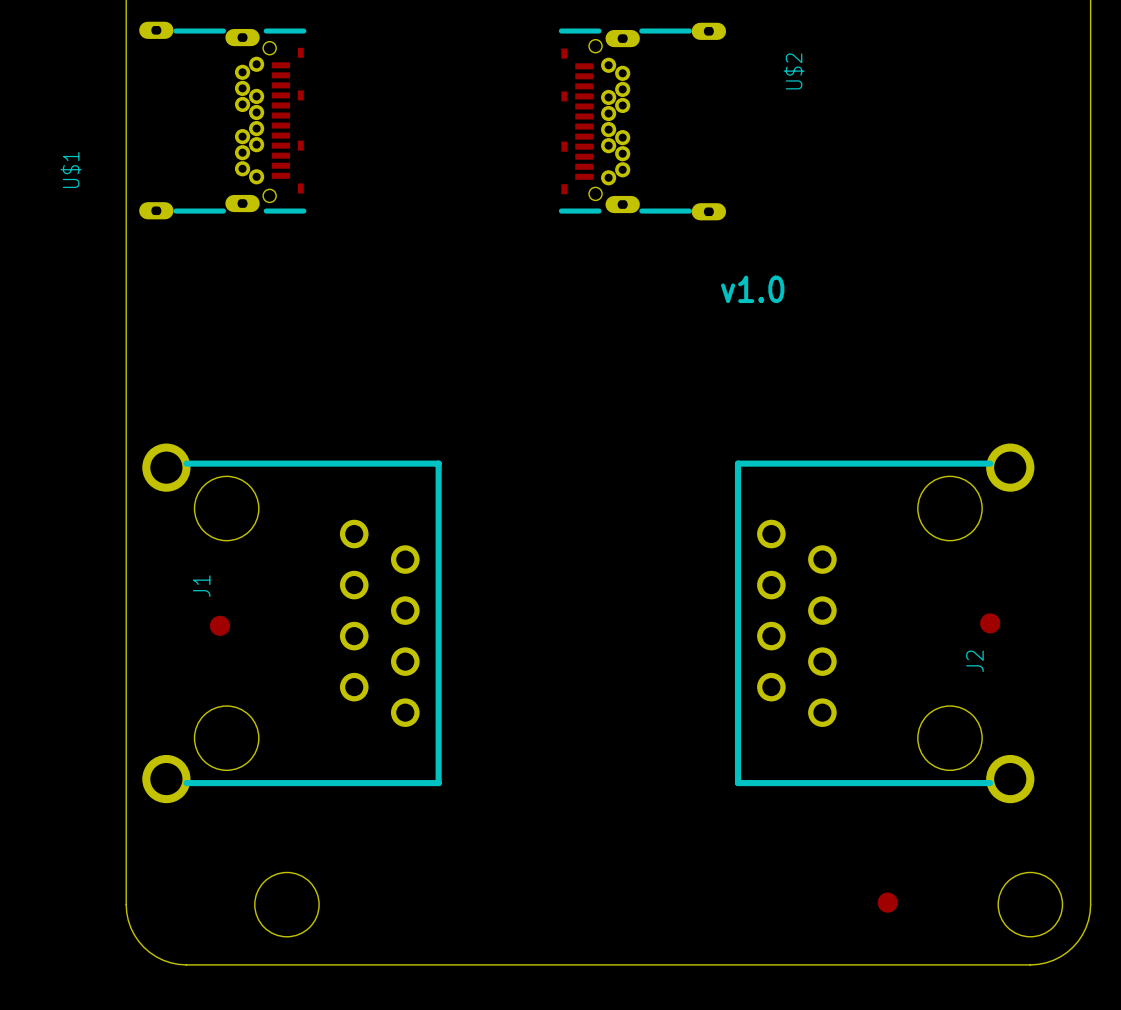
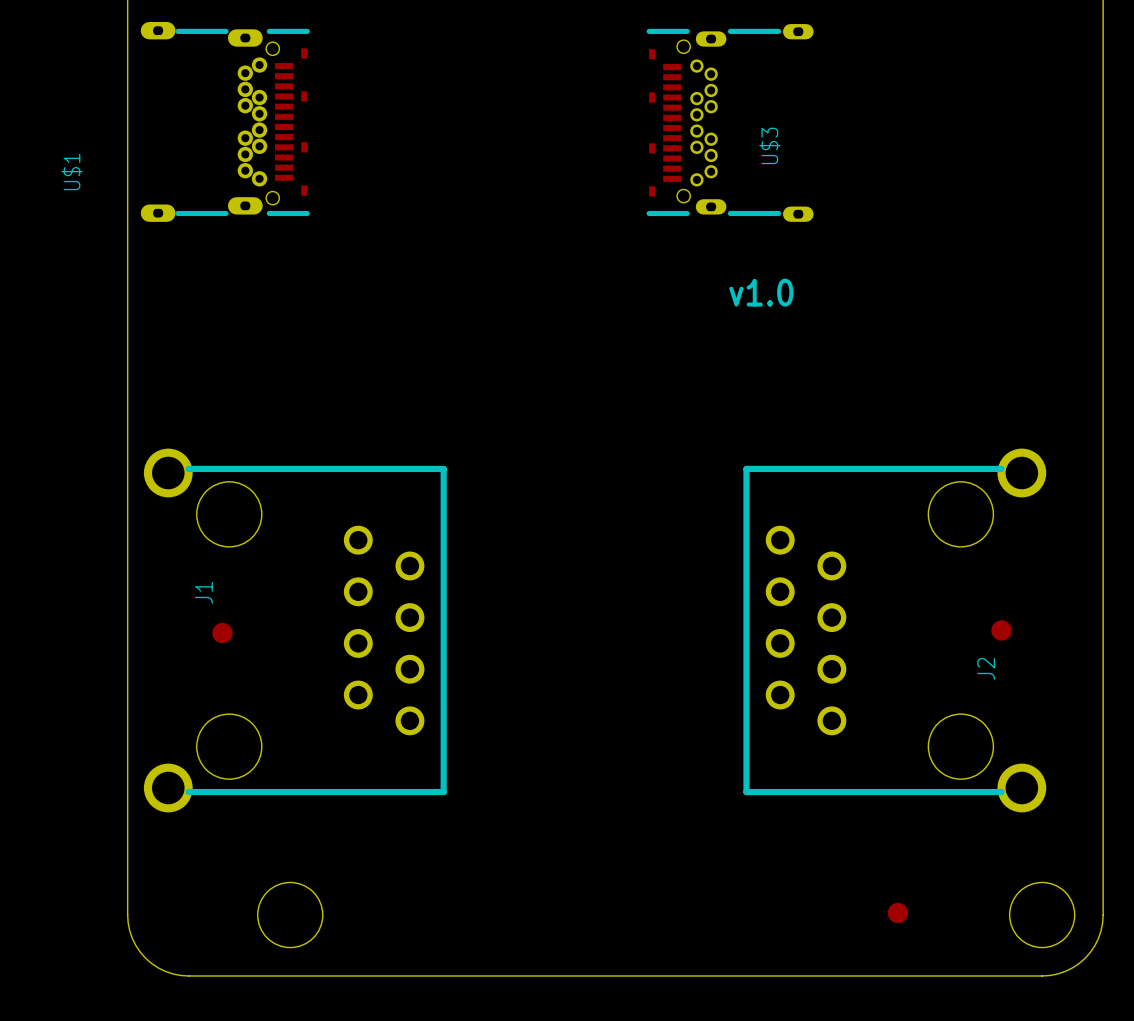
U$2: (642, 121) -> none
U$3: none -> (730, 122)

